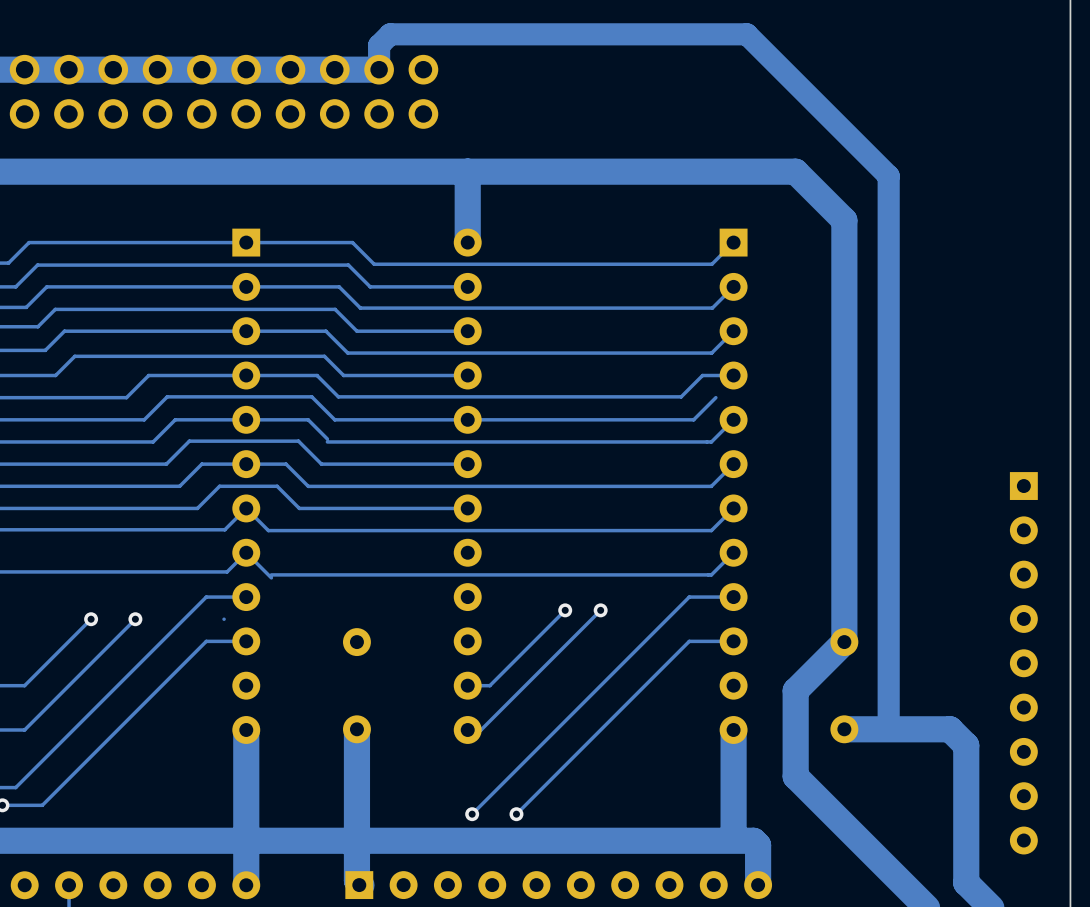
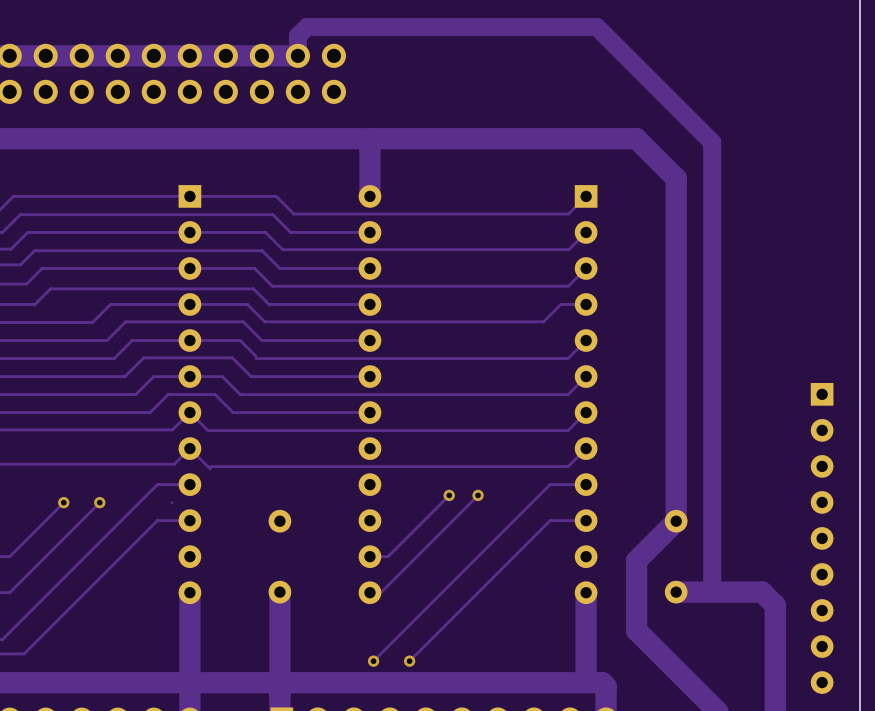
track: (715, 397) (693, 419) (467, 419) -> none

